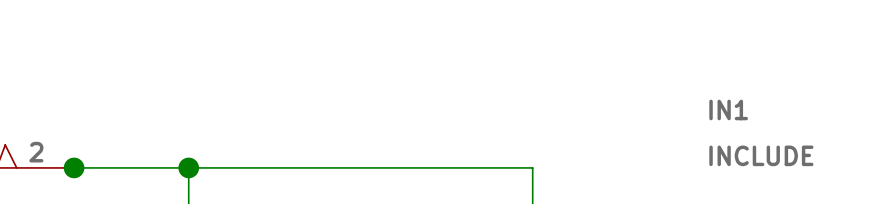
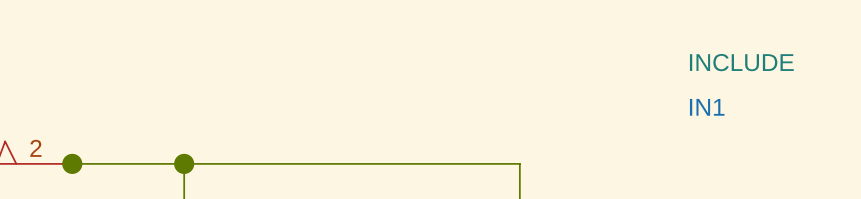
IN1 position: (761, 132) -> (741, 84)
IN1 value position: INCLUDE (761, 155) -> INCLUDE (741, 62)

